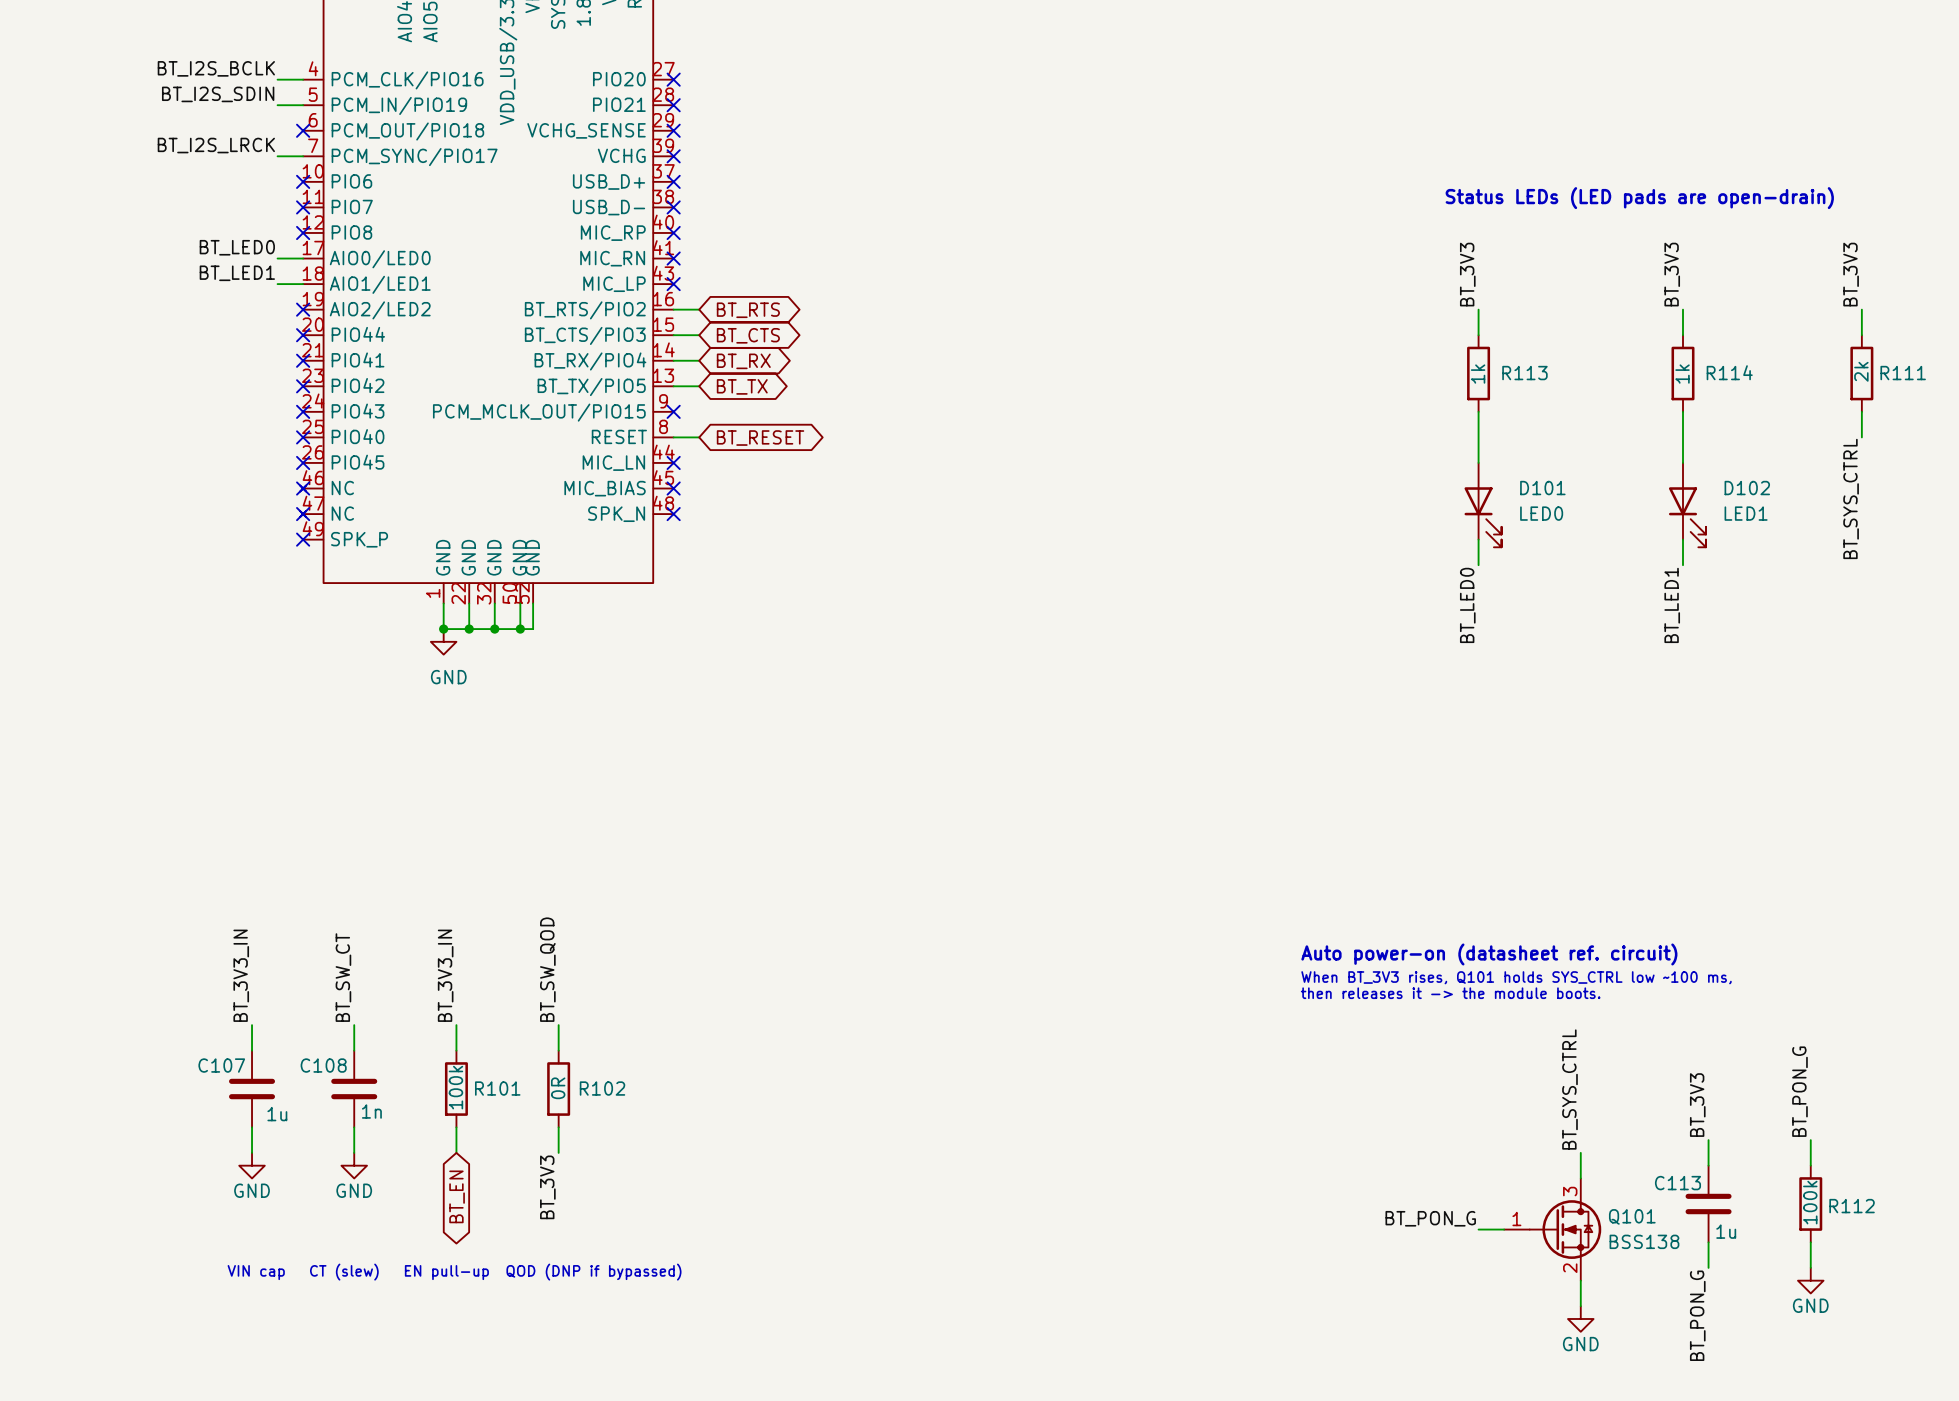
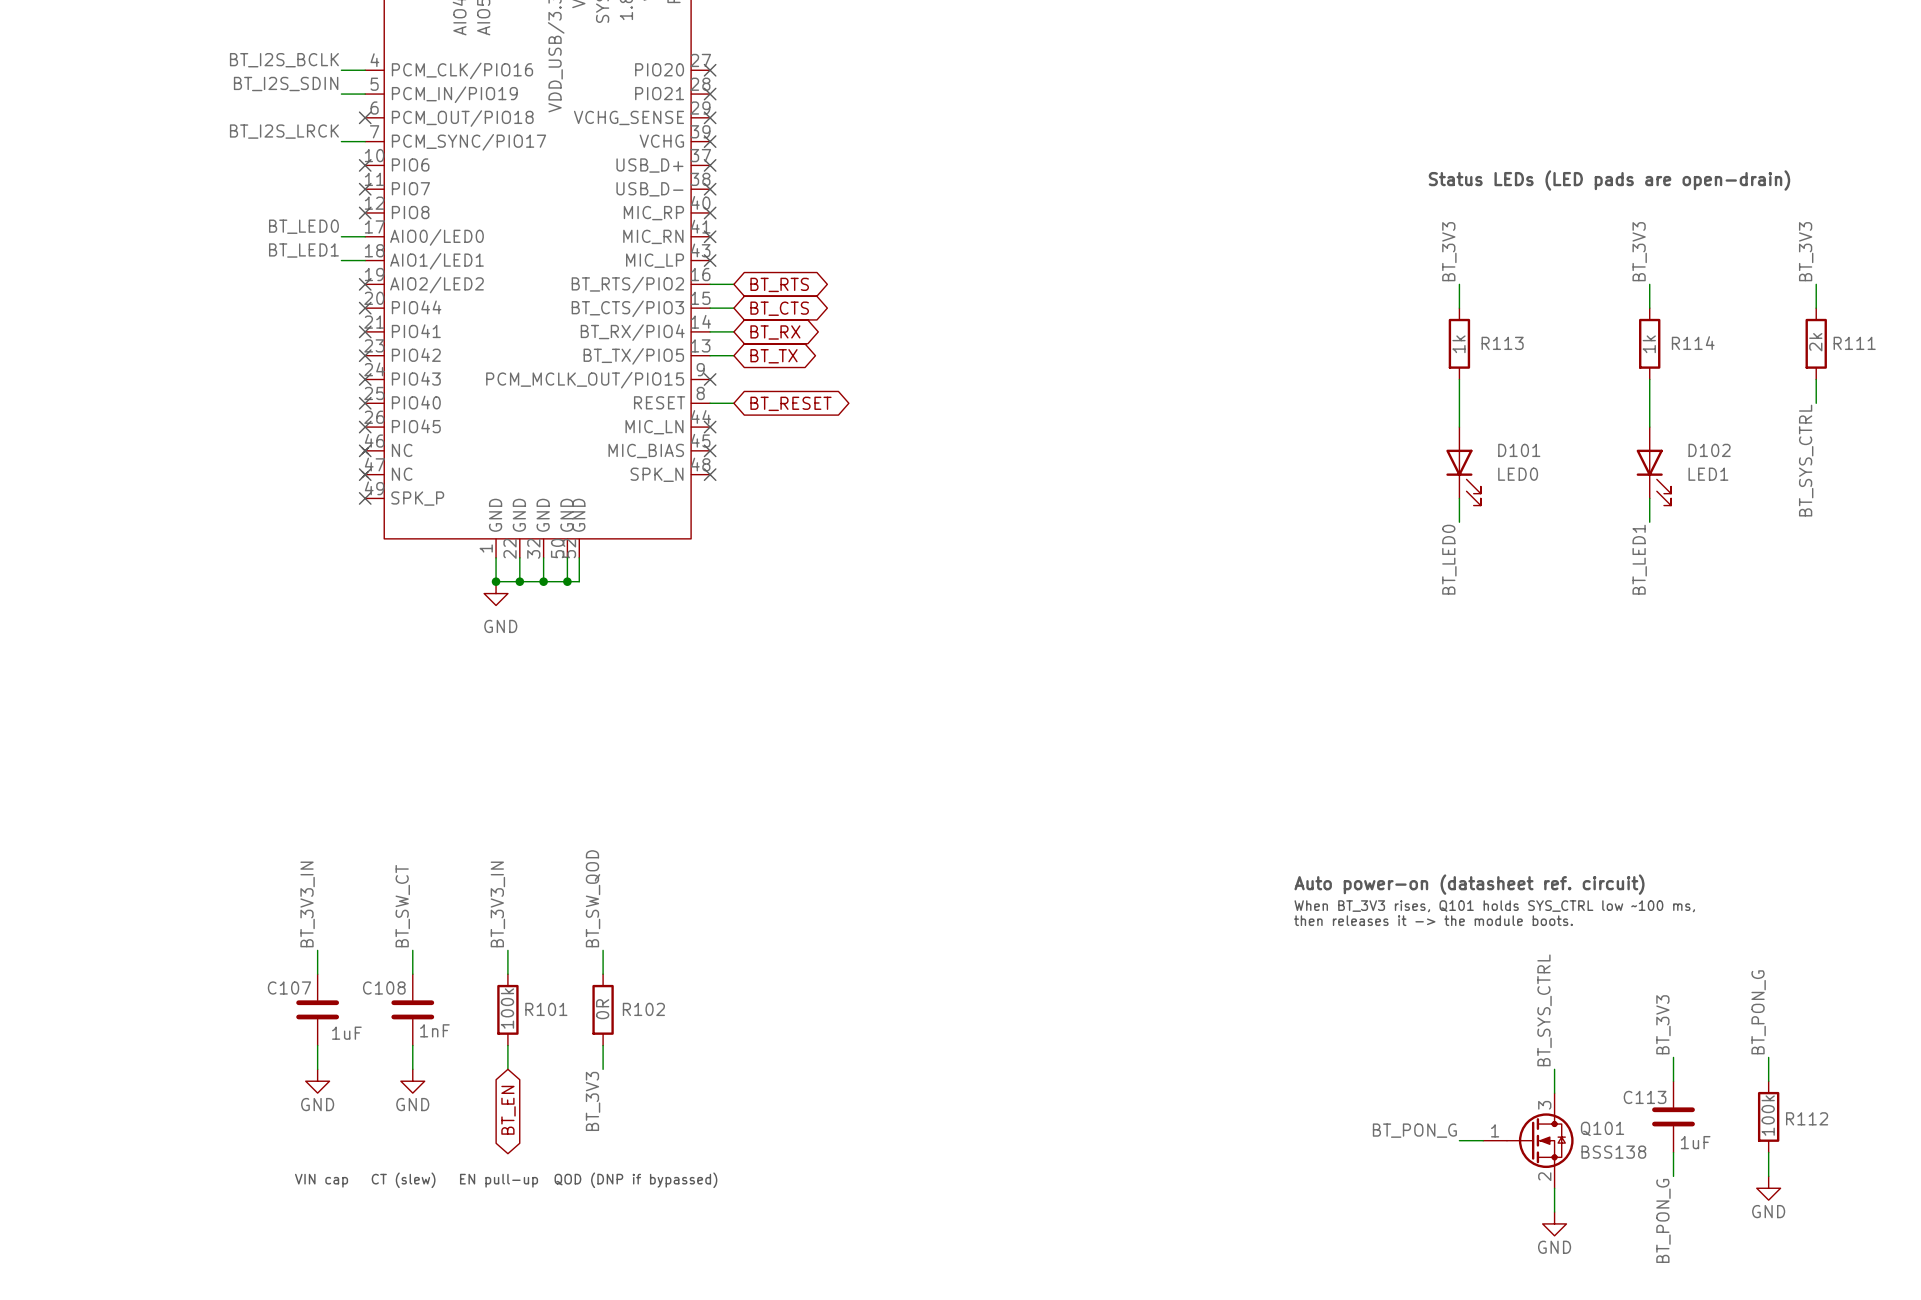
C108 value: 1n (371, 1111) -> 1nF (434, 1030)
C107 value: 1u (277, 1114) -> 1uF (346, 1033)
C113 value: 1u (1726, 1231) -> 1uF (1695, 1142)

